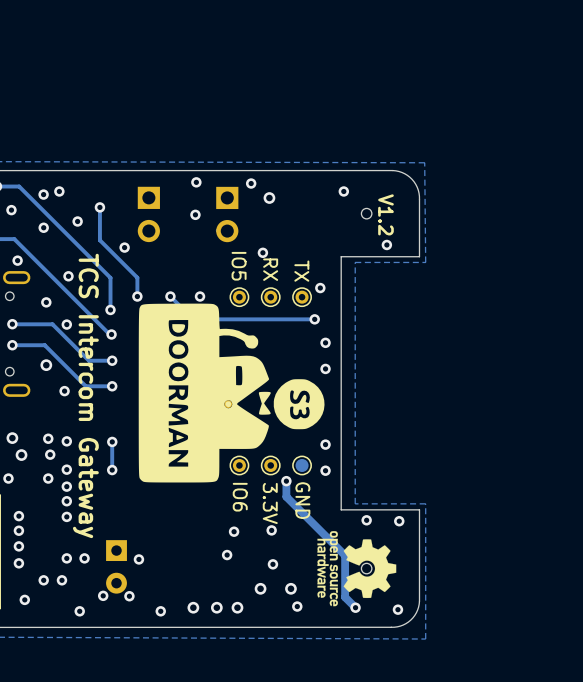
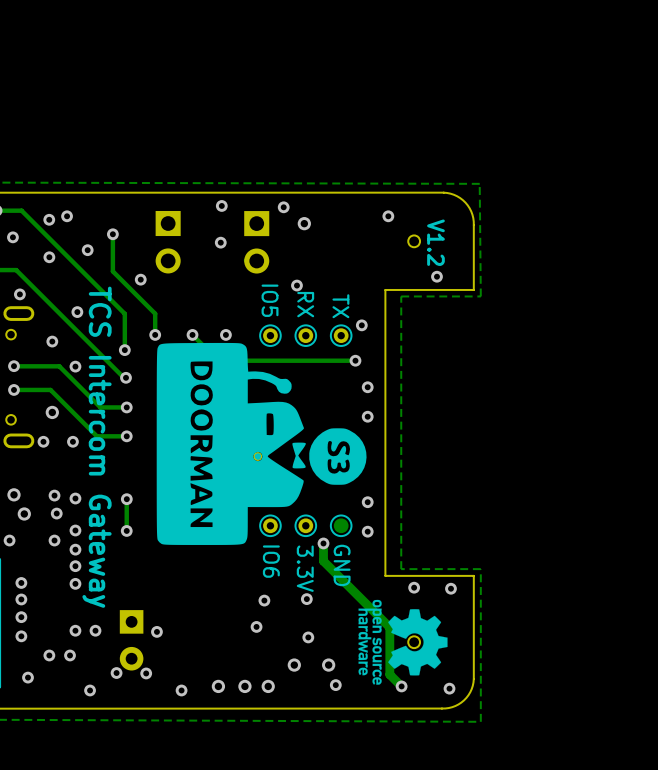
via: none -> (43, 441)

